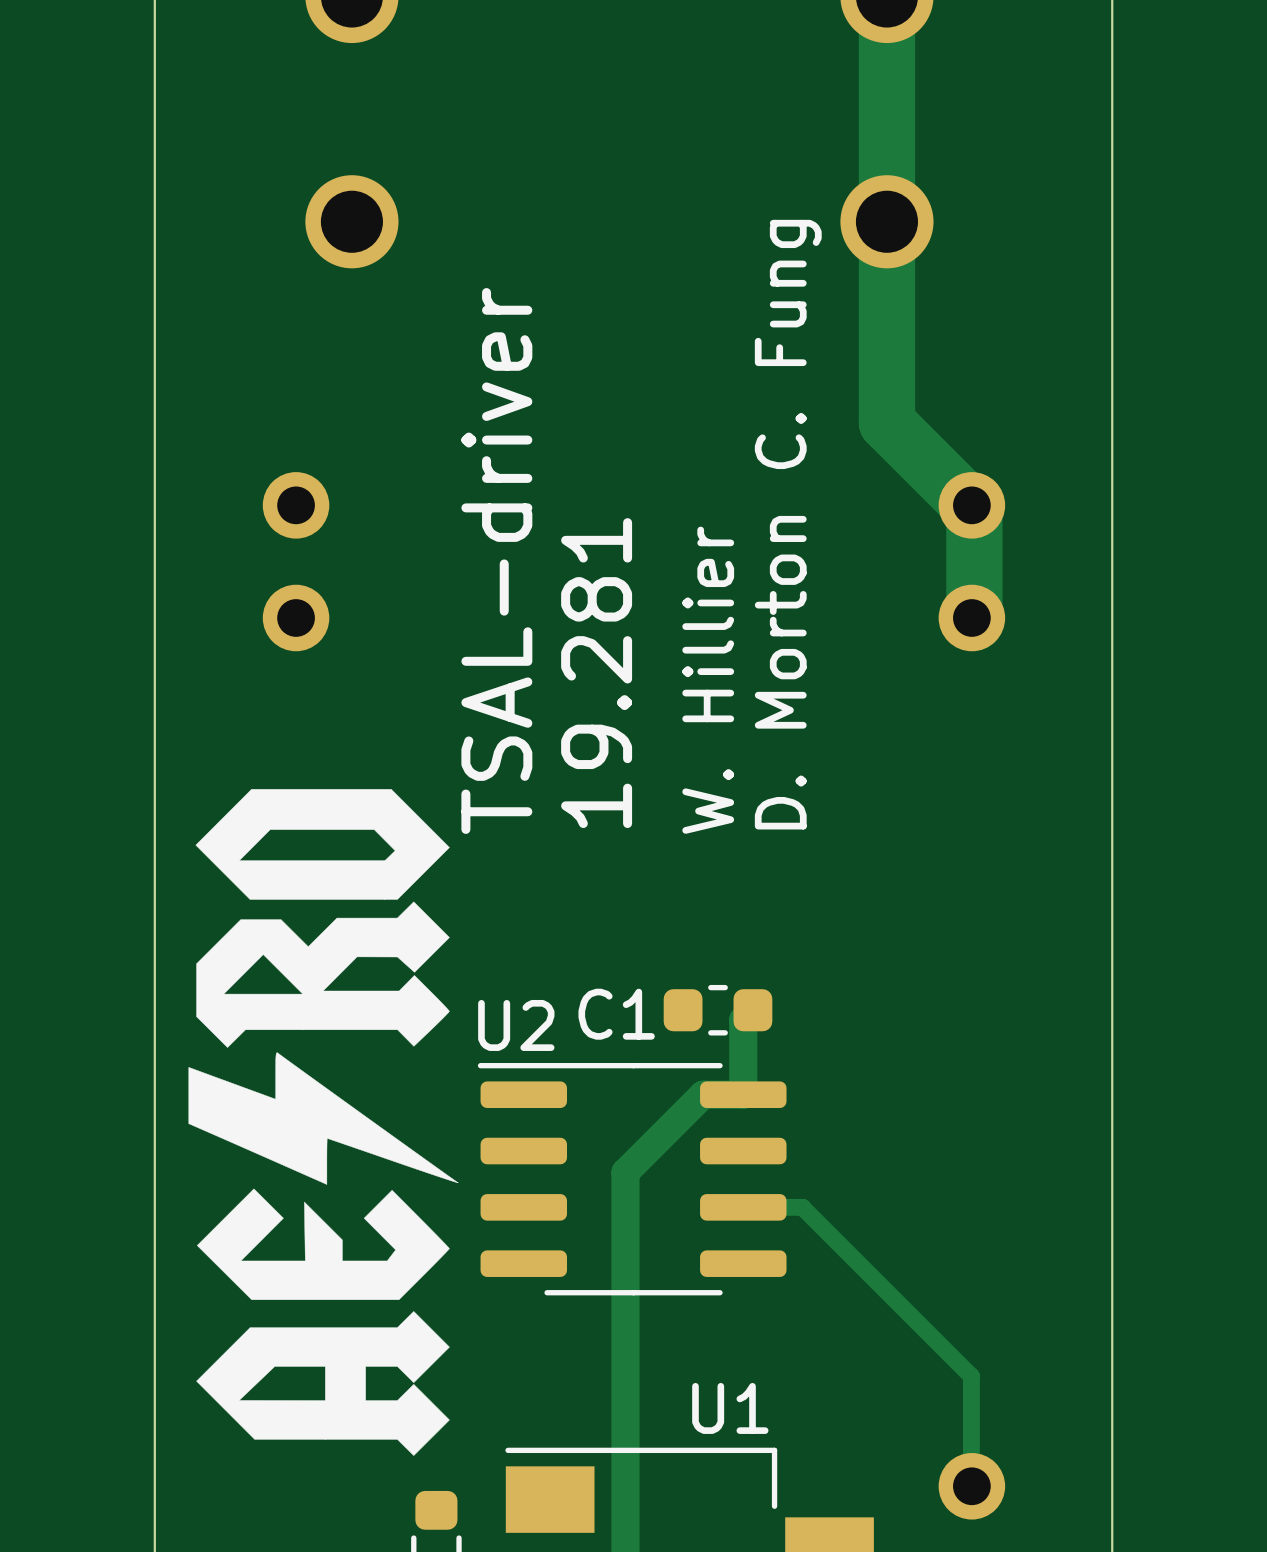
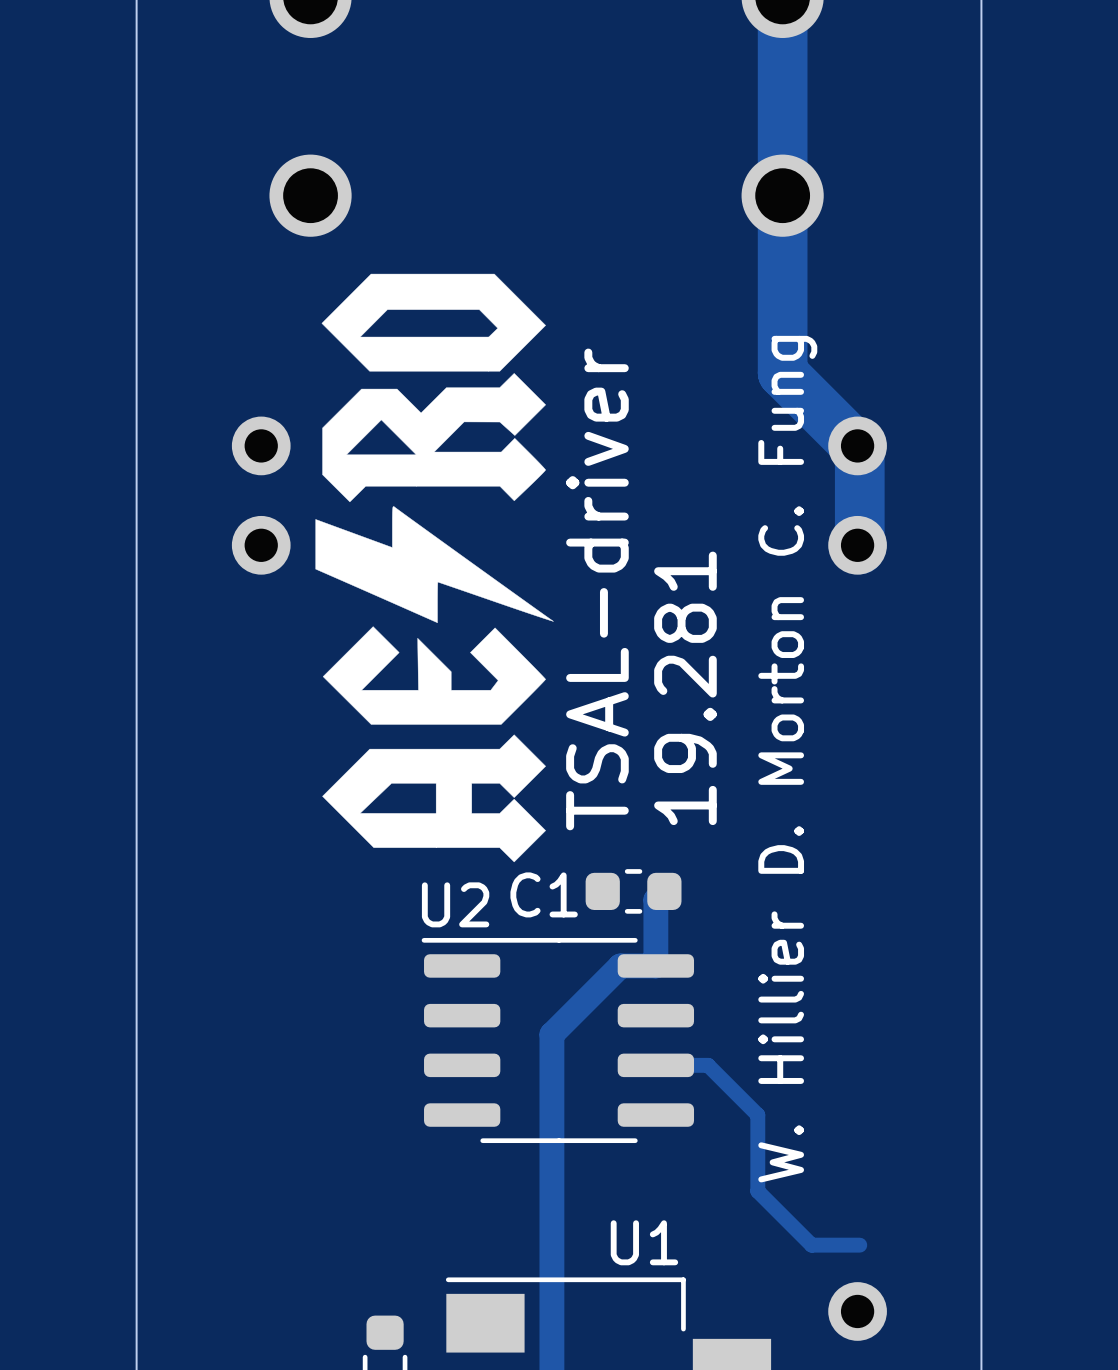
text: D. Morton C. Fung (788, 524) -> none
text position: TSAL-driver (496, 560) -> TSAL-driver (597, 589)
text position: 19.281 (596, 673) -> 19.281 (685, 688)
text: W. Hillier (708, 680) -> none
text: none -> W. Hillier D. Morton C. Fung (787, 759)
drawing position: (323, 1122) -> (434, 568)
track: (858, 1263) (971, 1376) (971, 1485) -> (757, 1115) (757, 1191) (811, 1245) (859, 1245)

